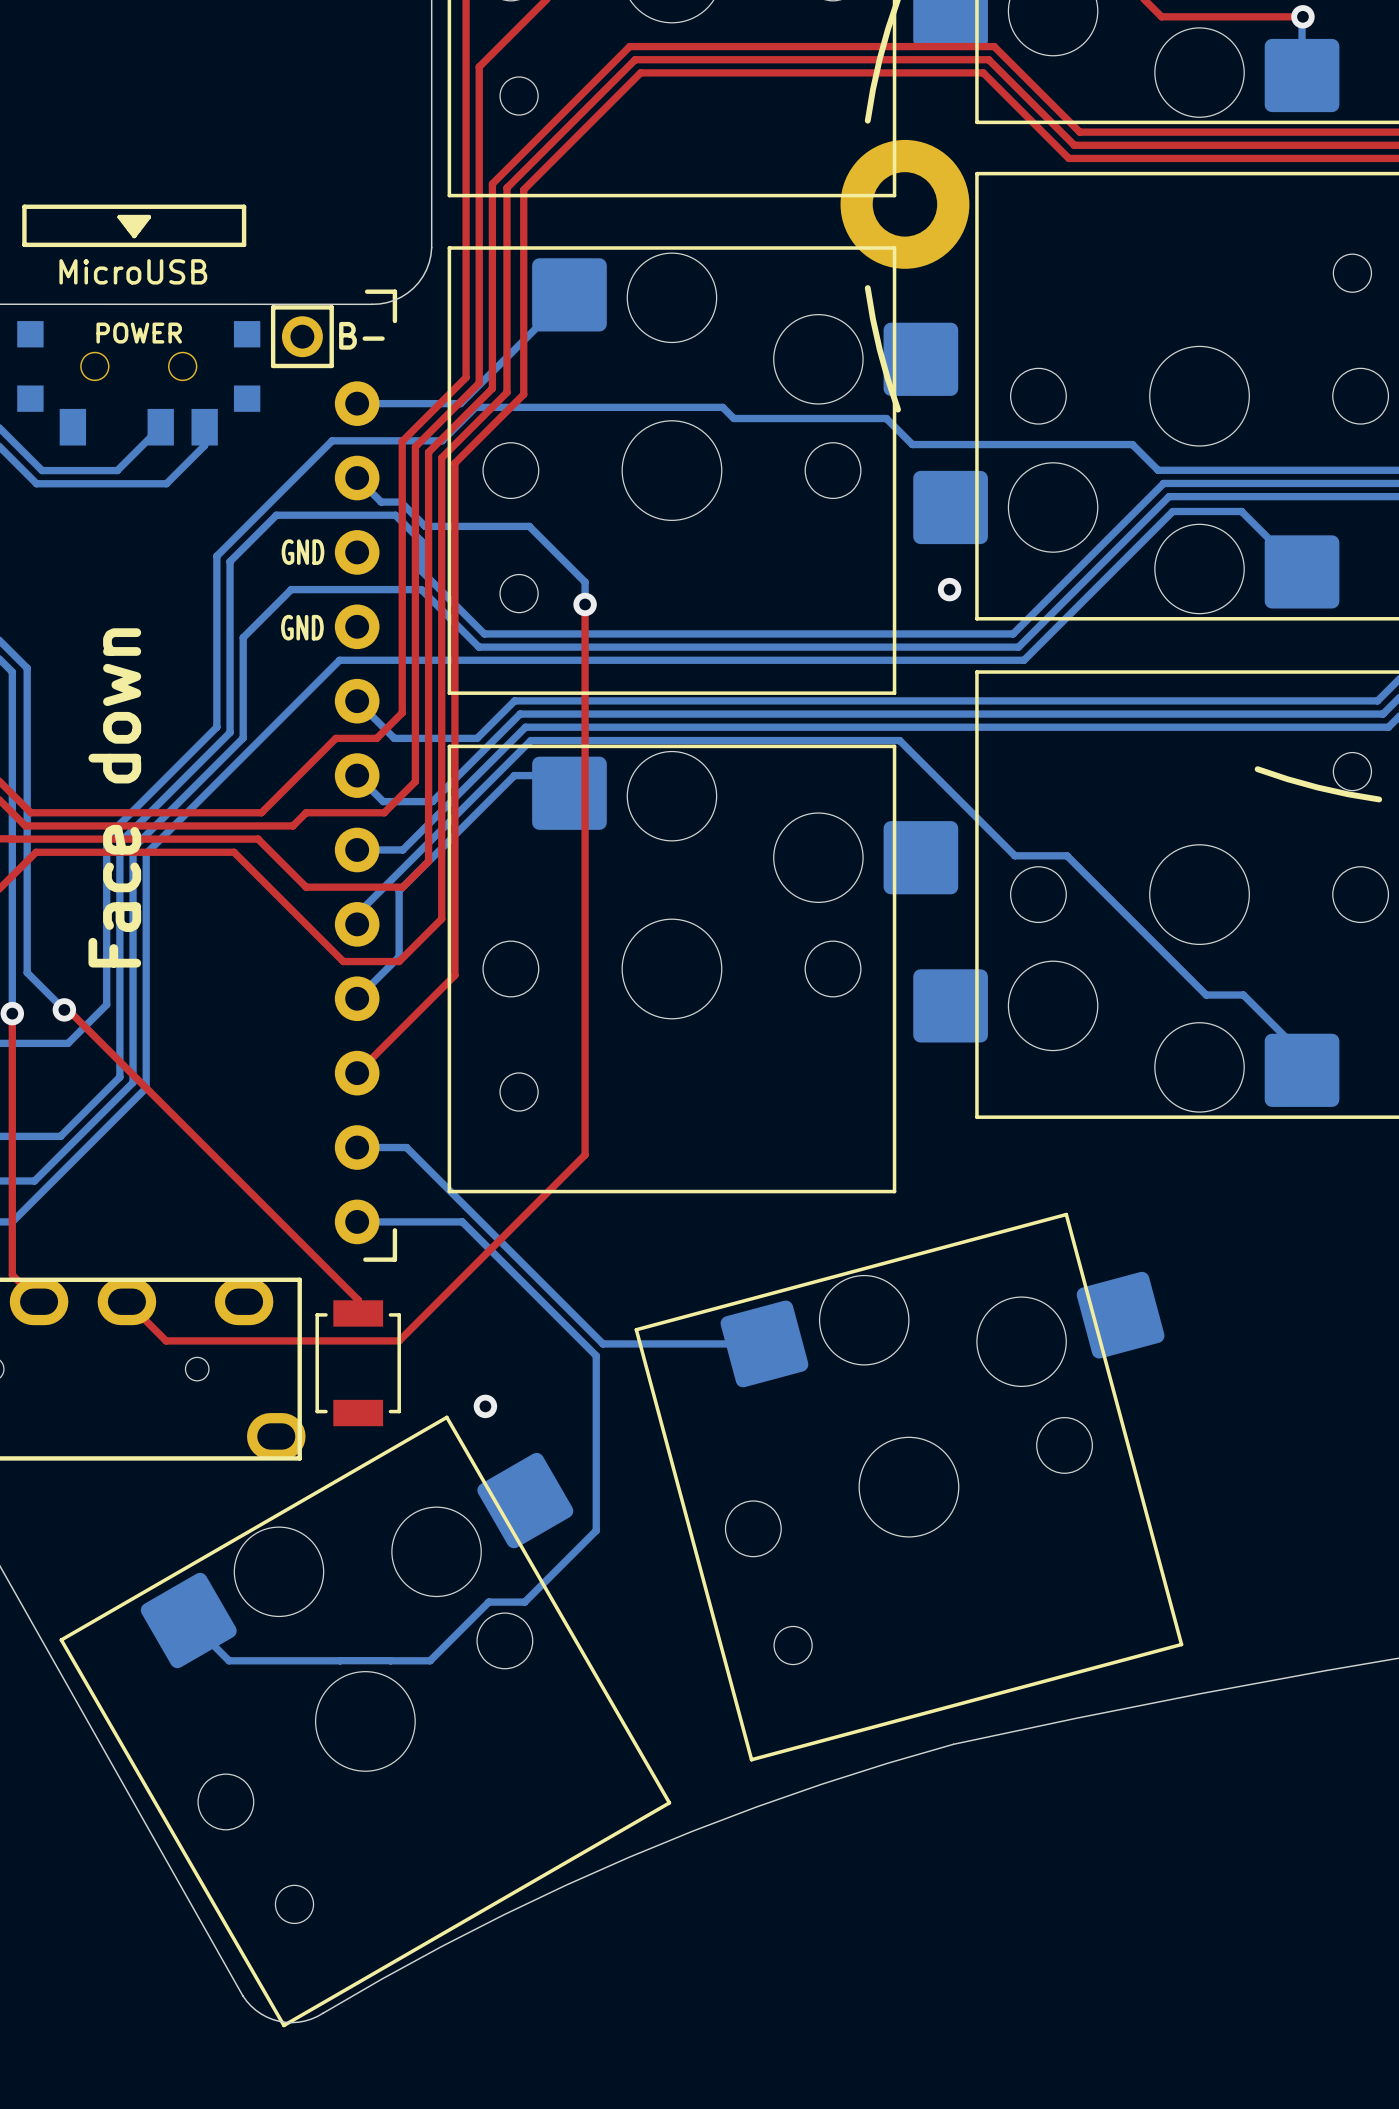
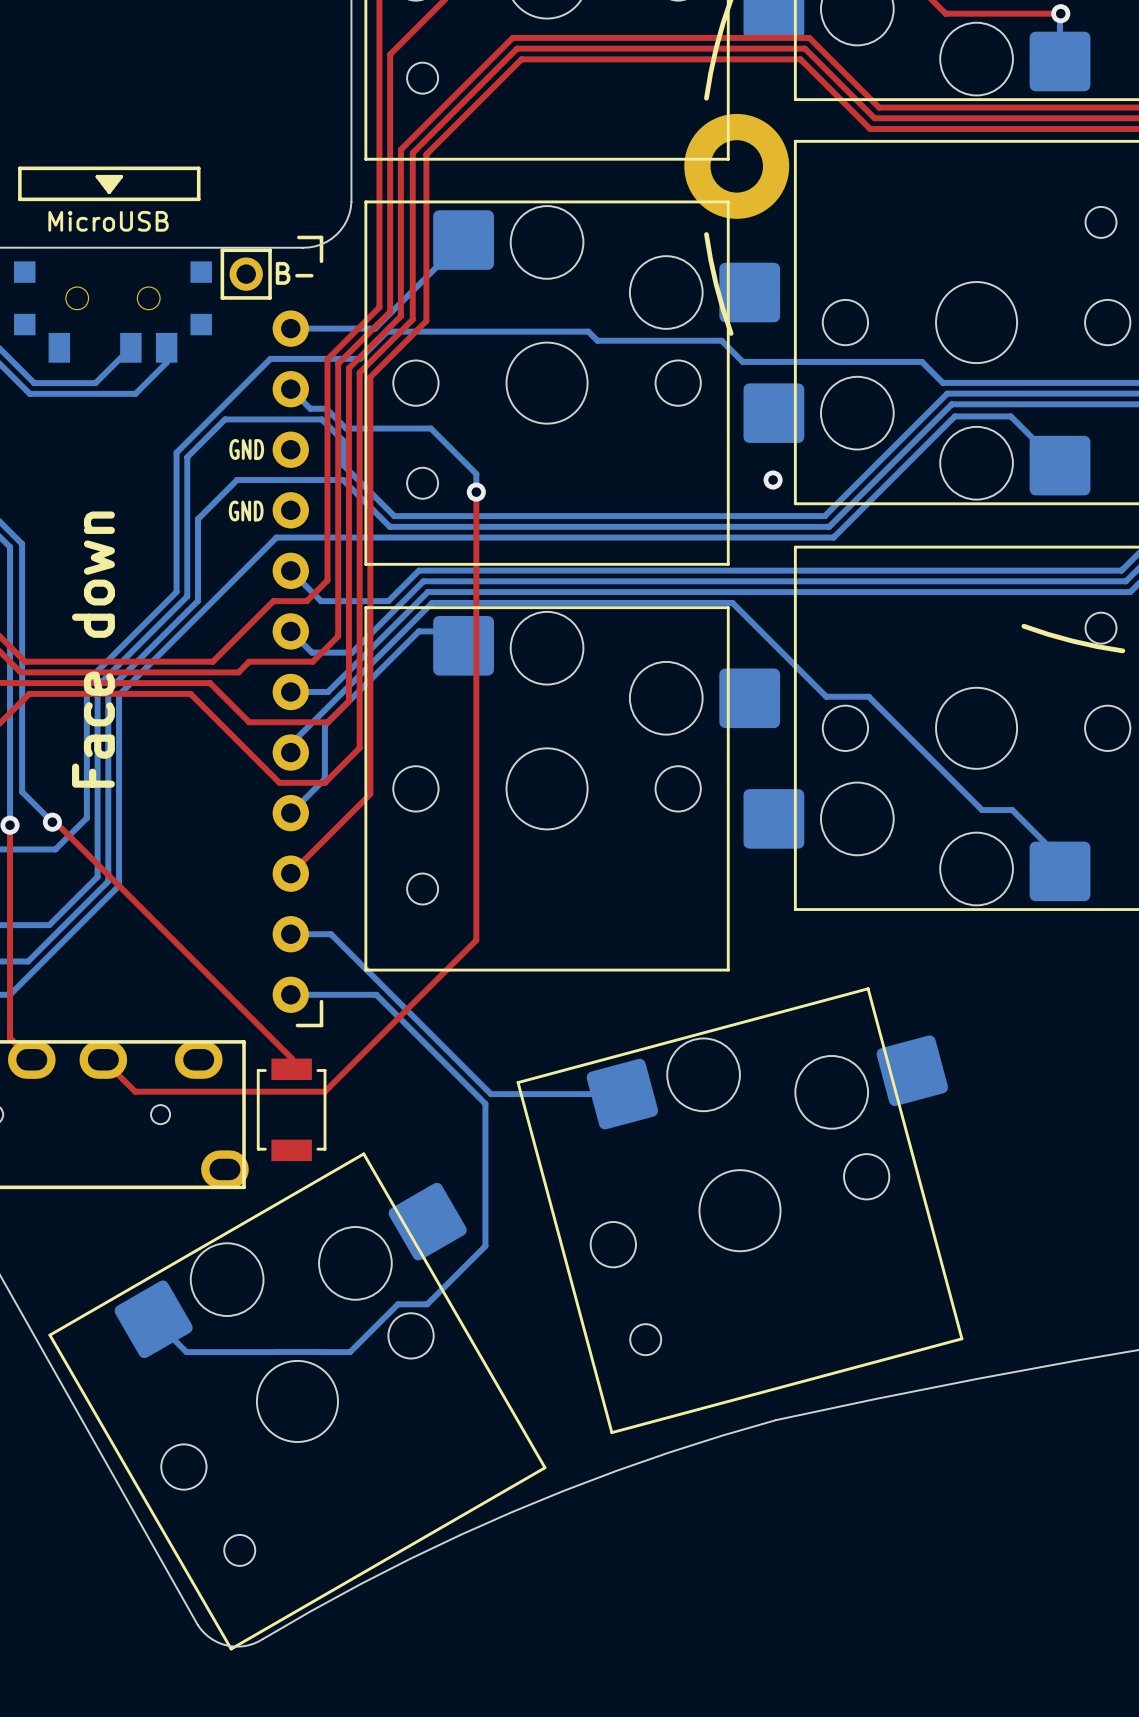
text: POWER (139, 333) -> none
B- name: none -> B- (294, 273)
text: B- (361, 335) -> none
via: (485, 1406) -> none

